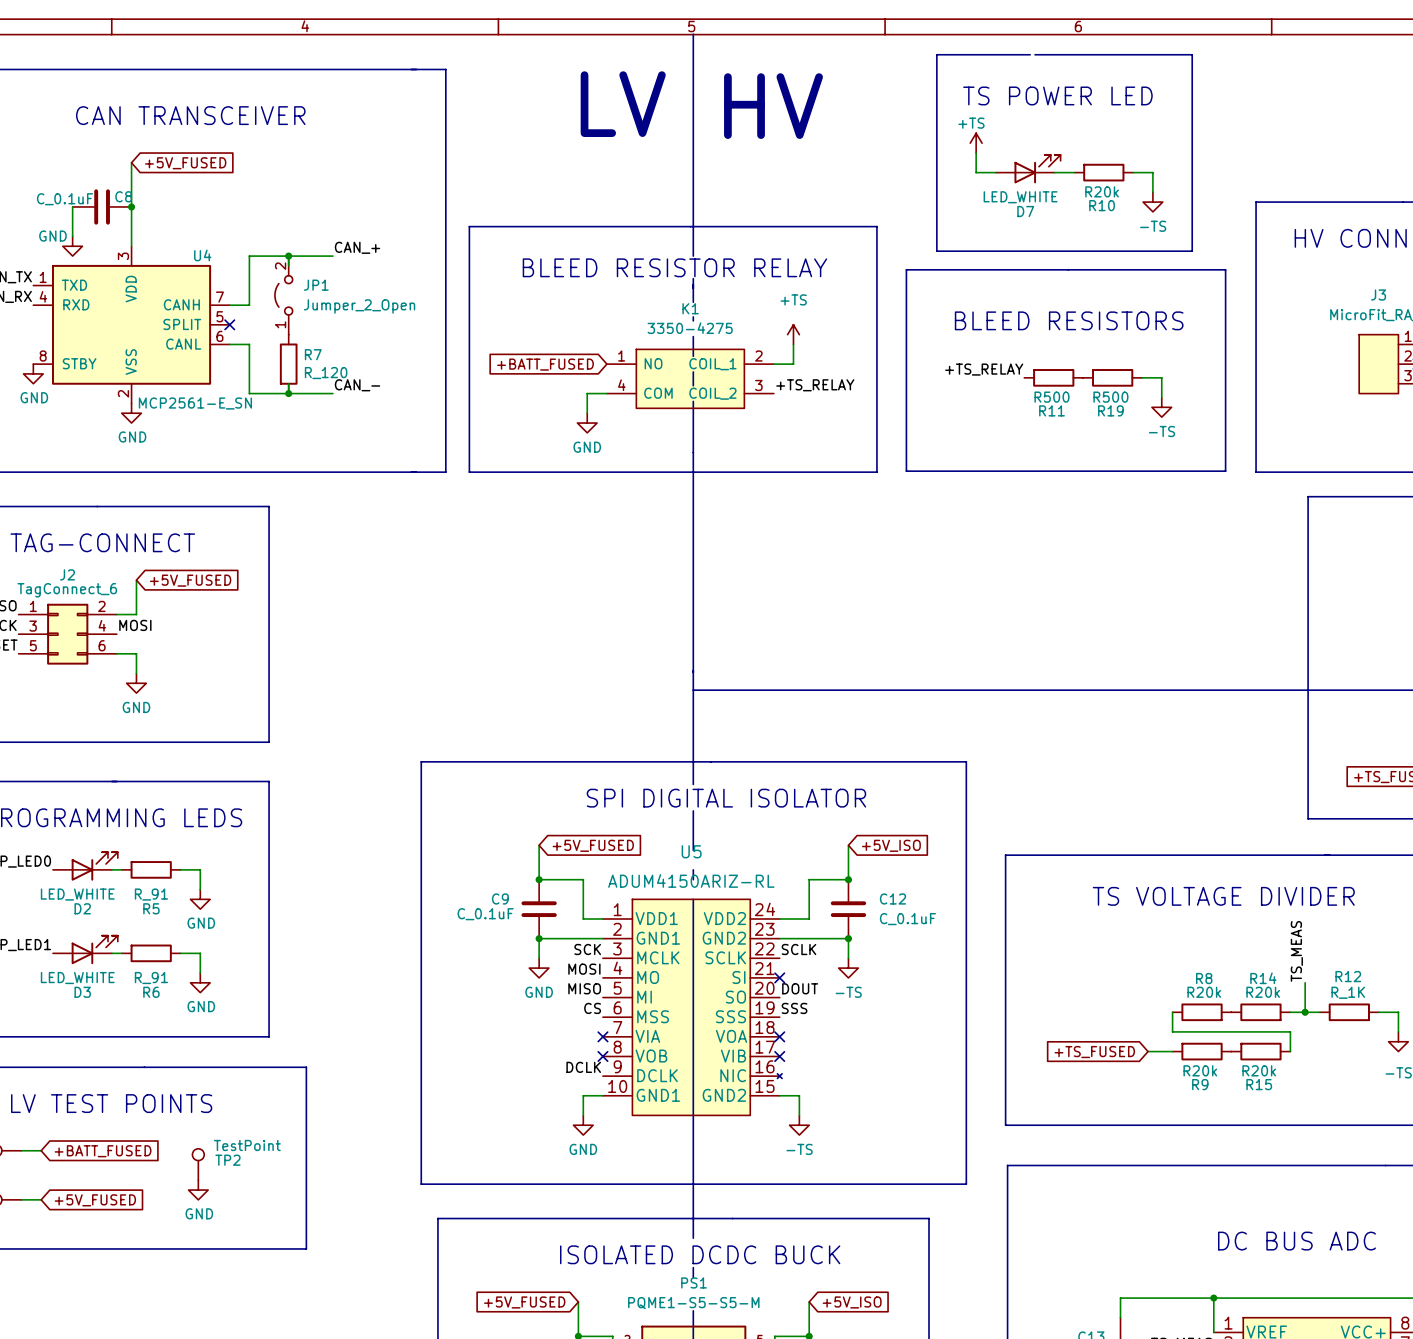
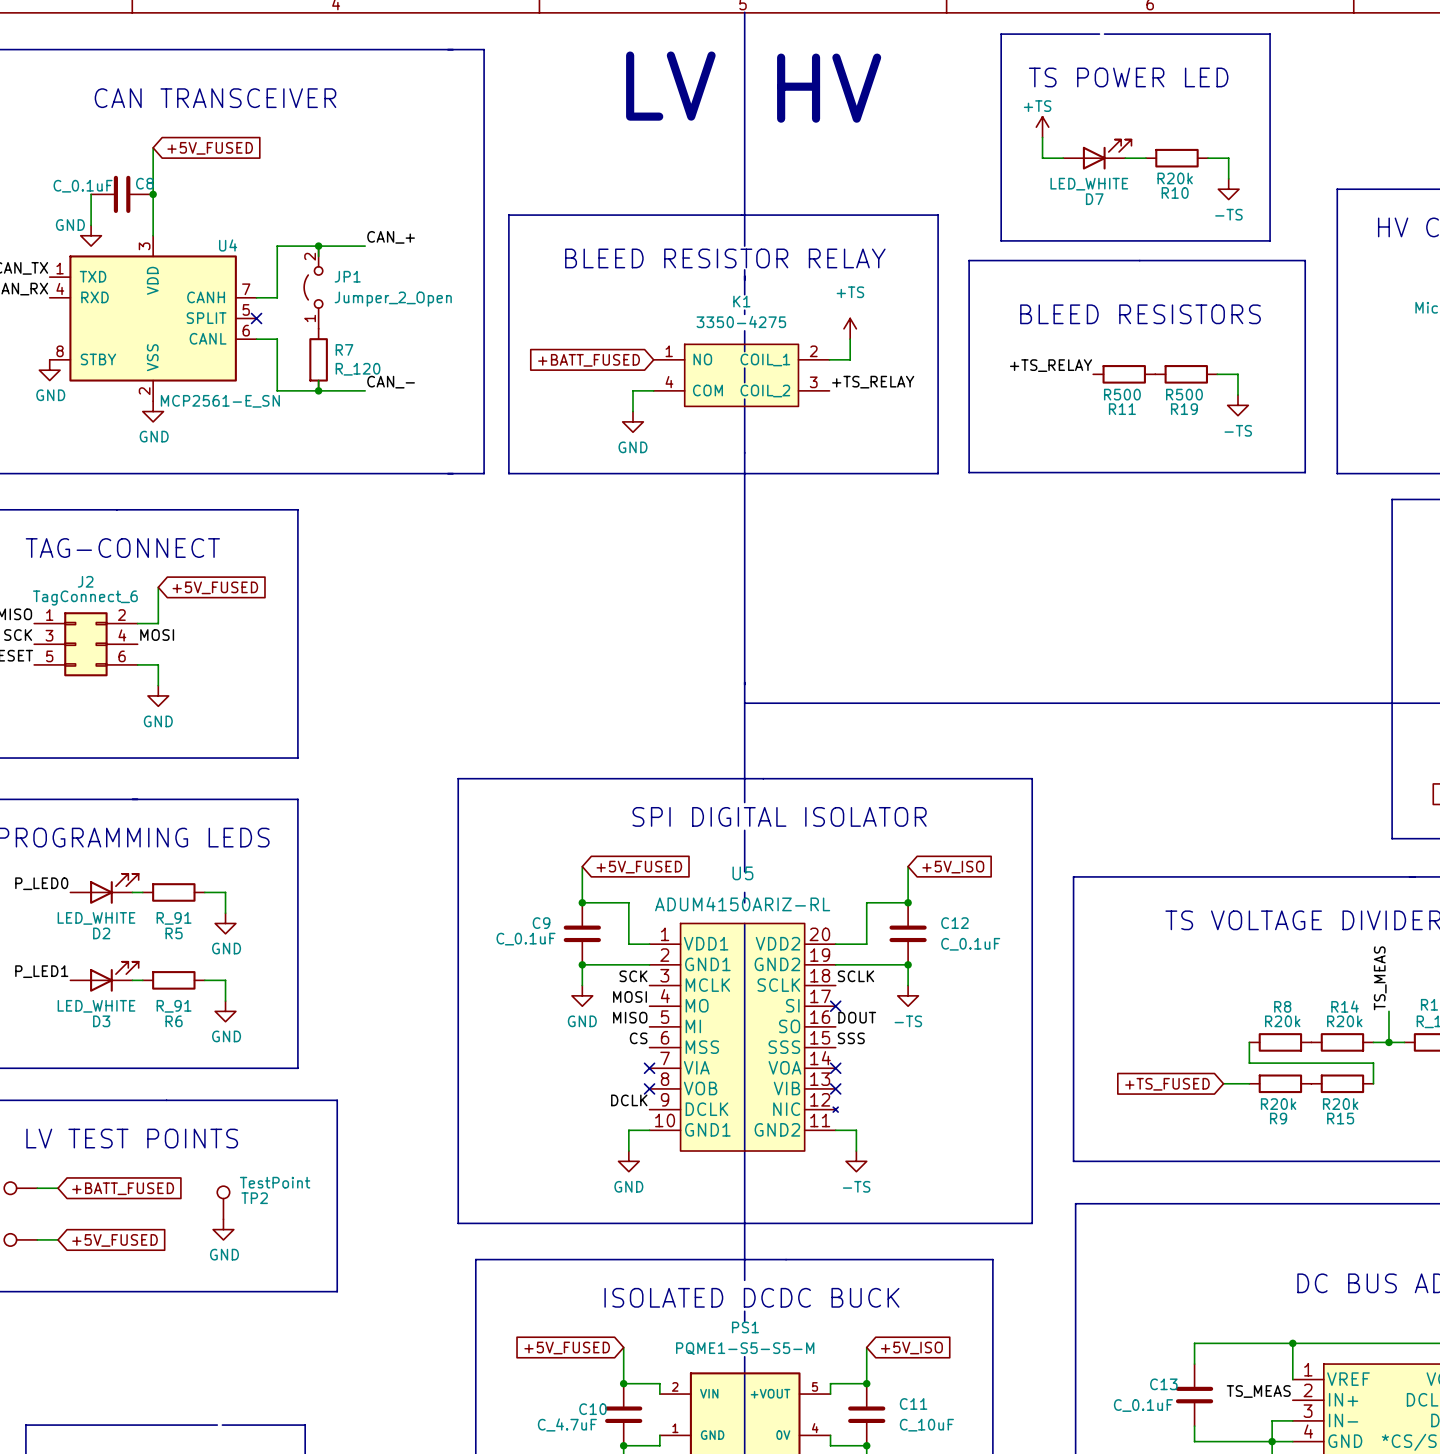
U5 symbol: [602, 899, 783, 1116] -> [649, 923, 839, 1152]

